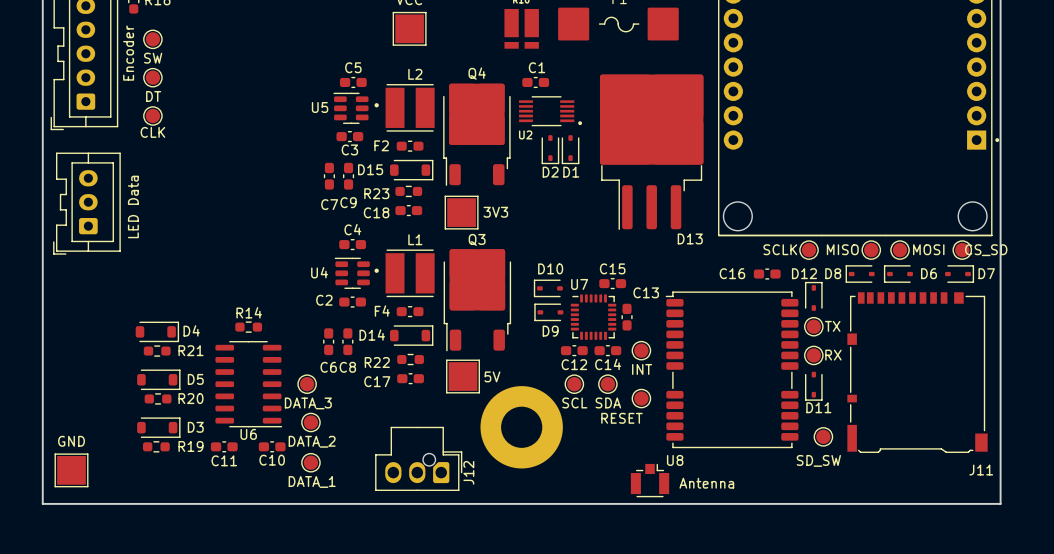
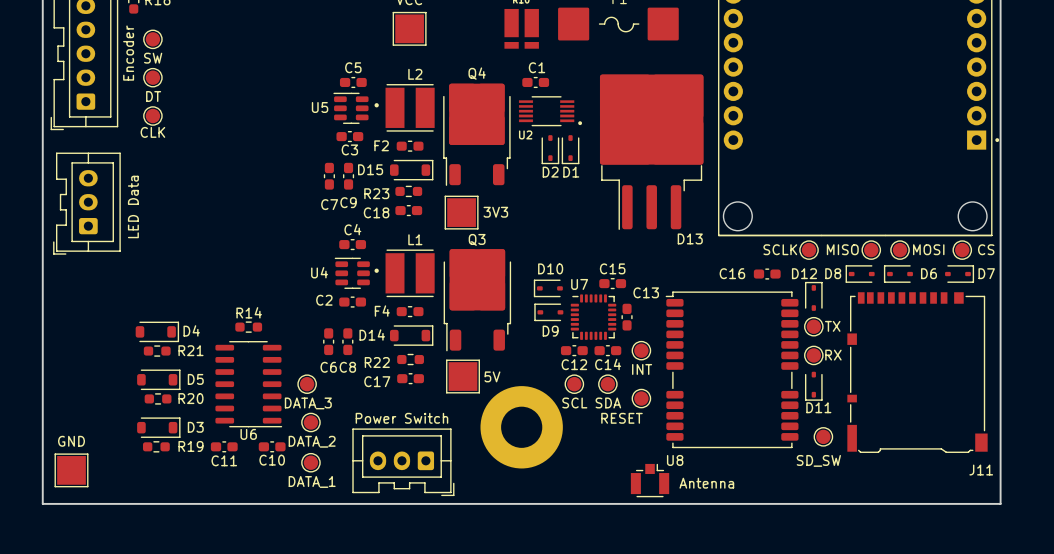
part value: CS_SD (986, 250) -> CS (986, 249)
J12: (418, 458) -> none
part: none -> Power Switch (403, 462)

